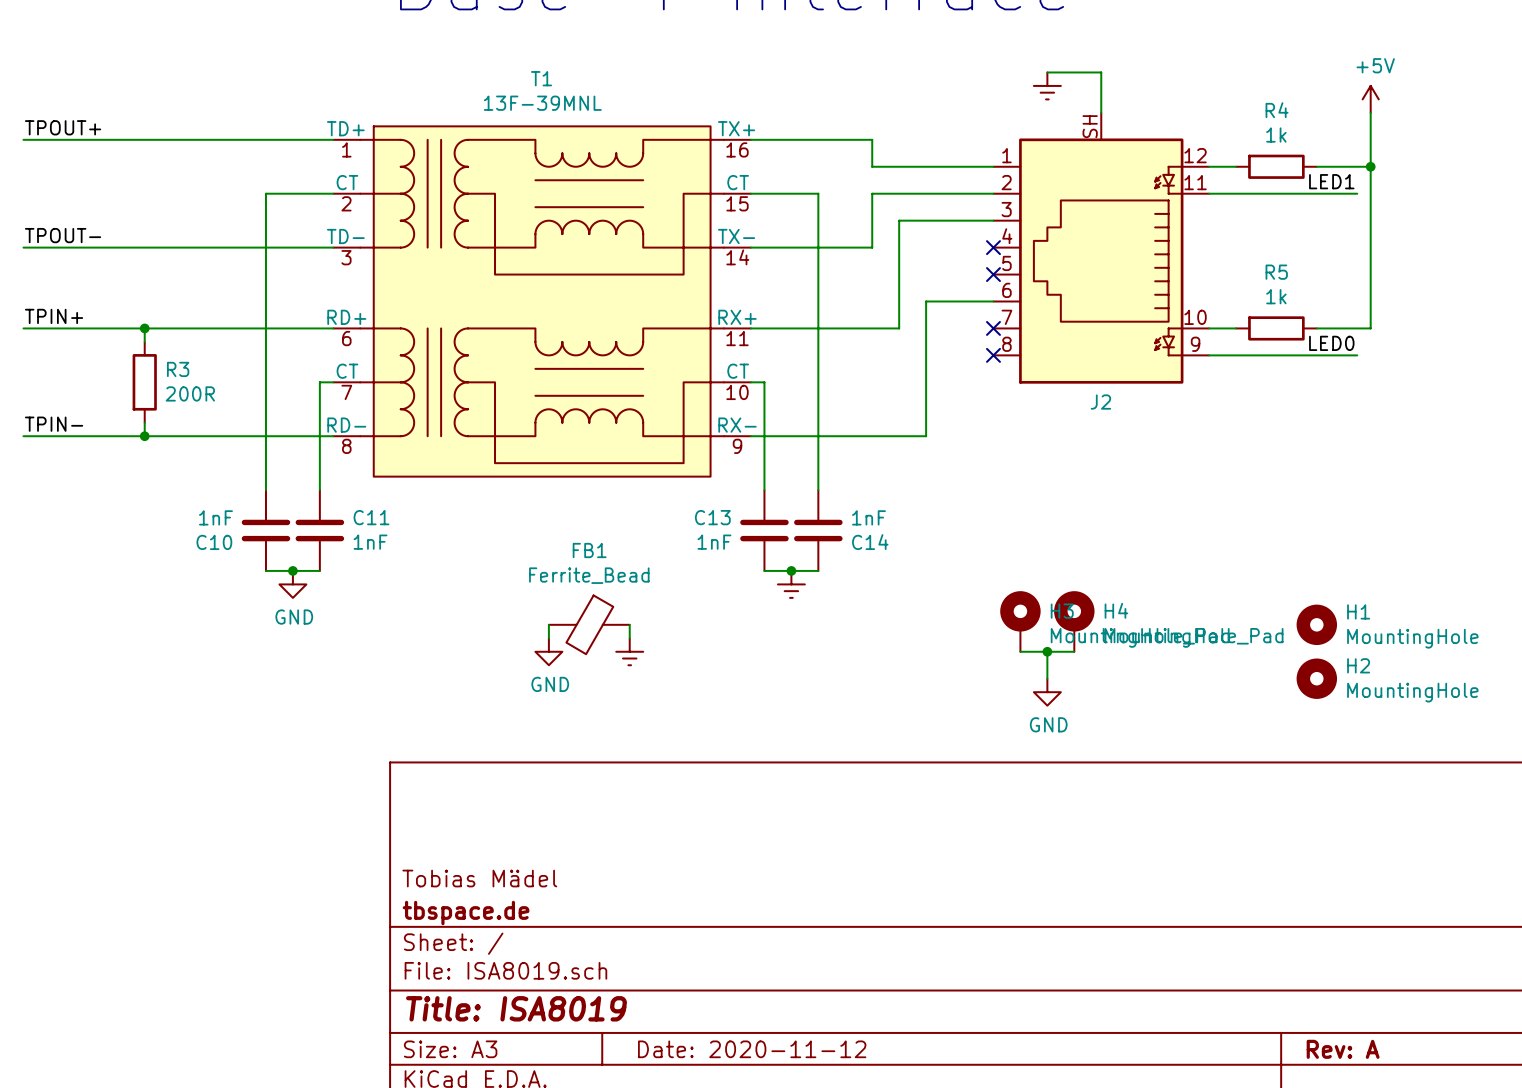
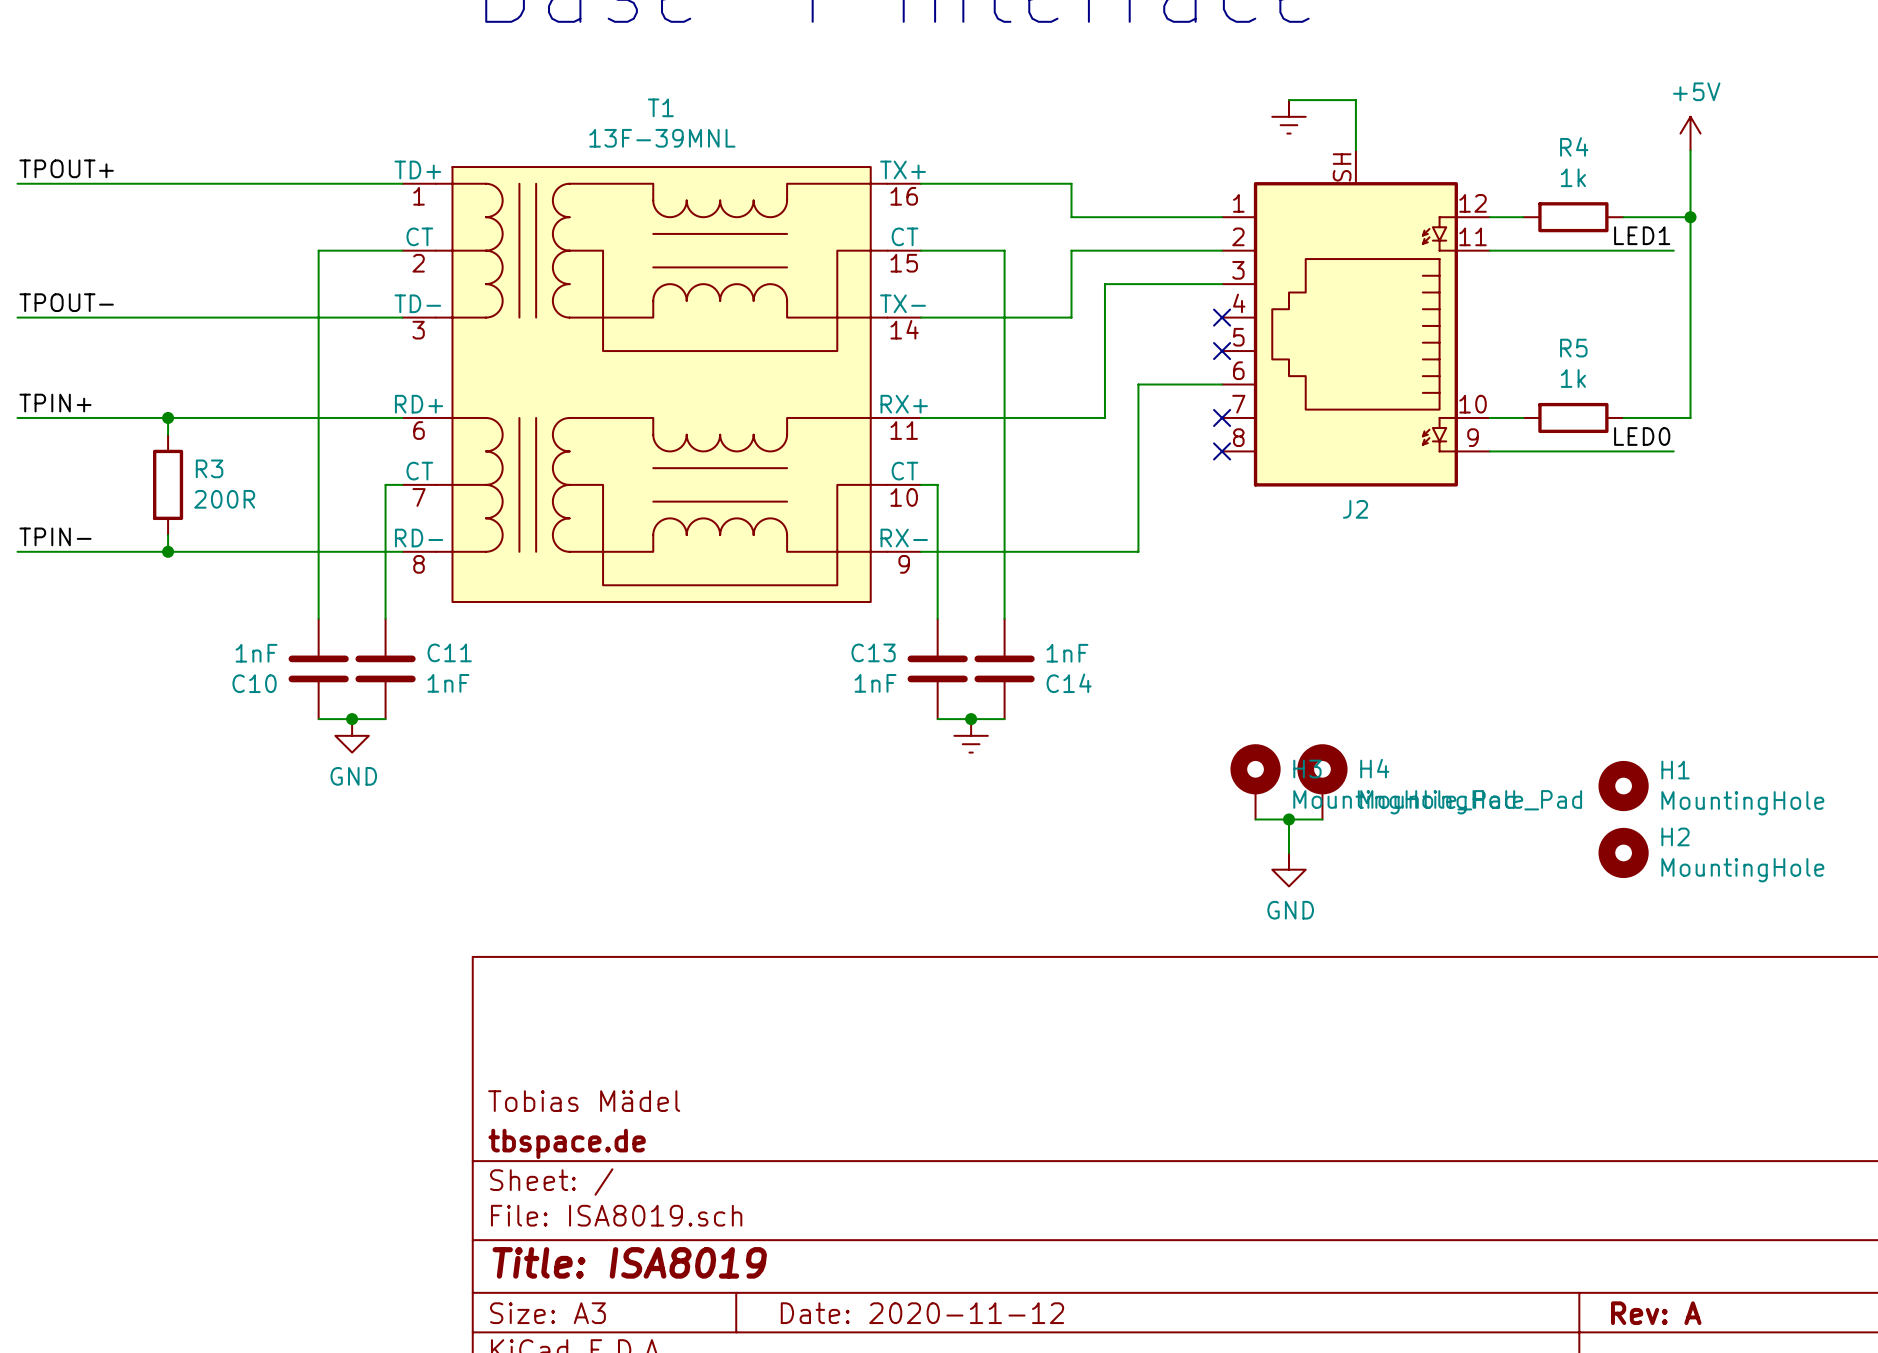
wire: (548, 624) (548, 638) -> none
FB1: Ferrite_Bead (589, 624) -> none
wire: (629, 624) (629, 638) -> none
power symbol: GND (548, 651) -> none
power symbol: (629, 651) -> none

